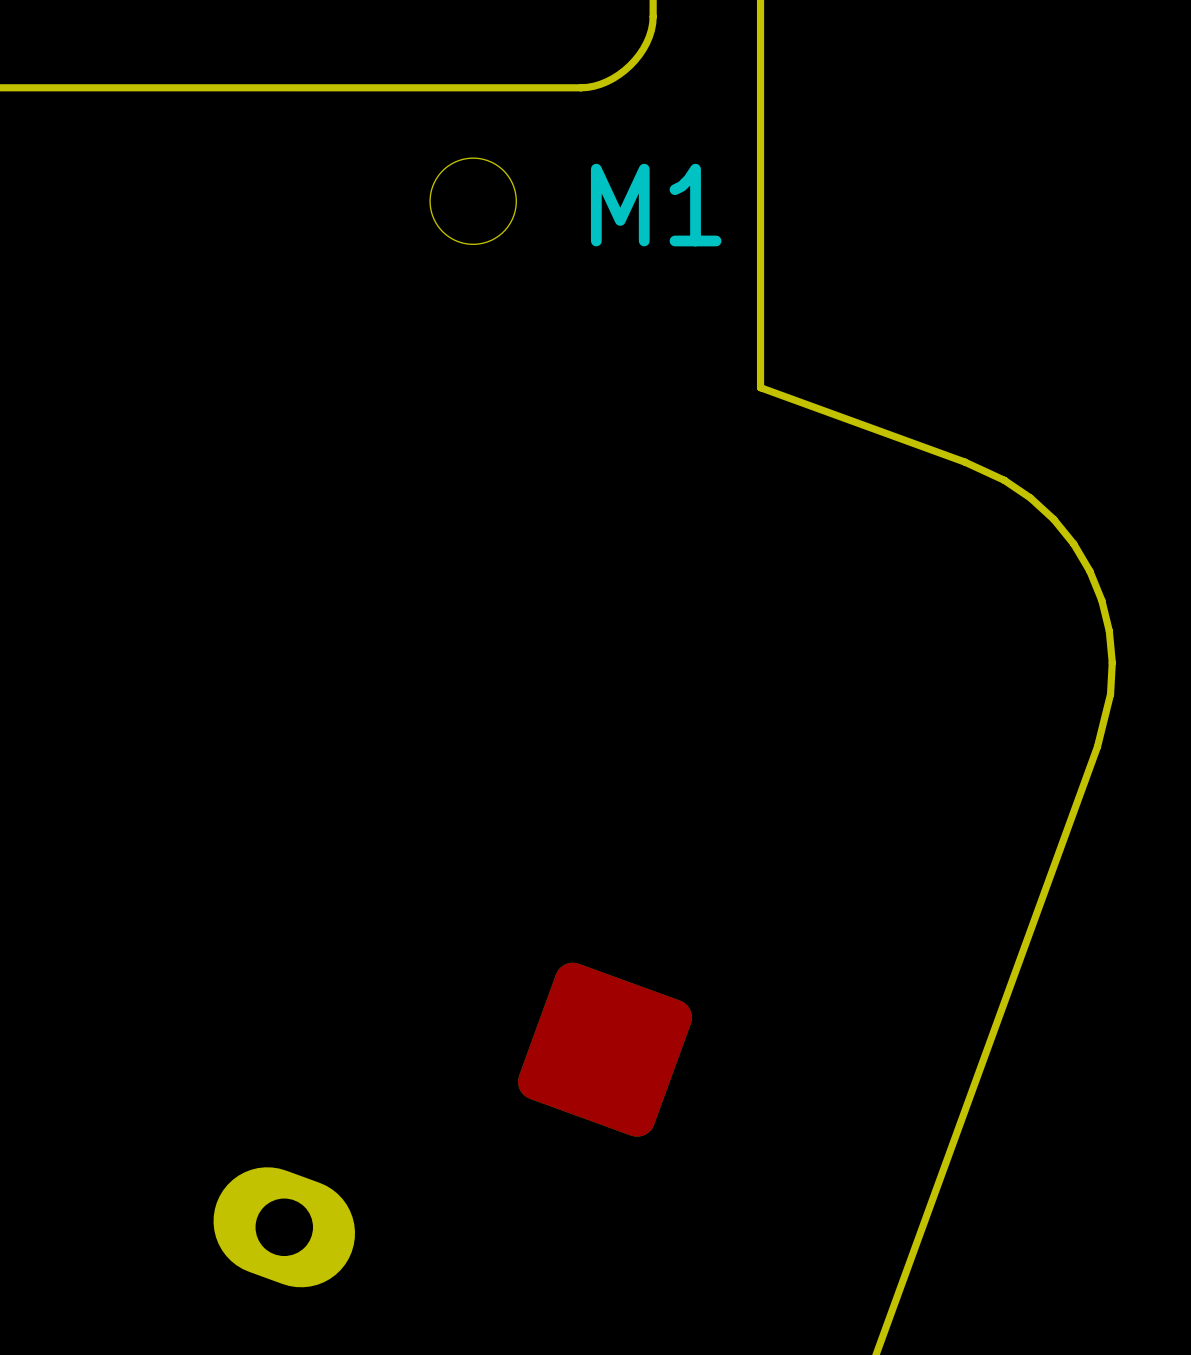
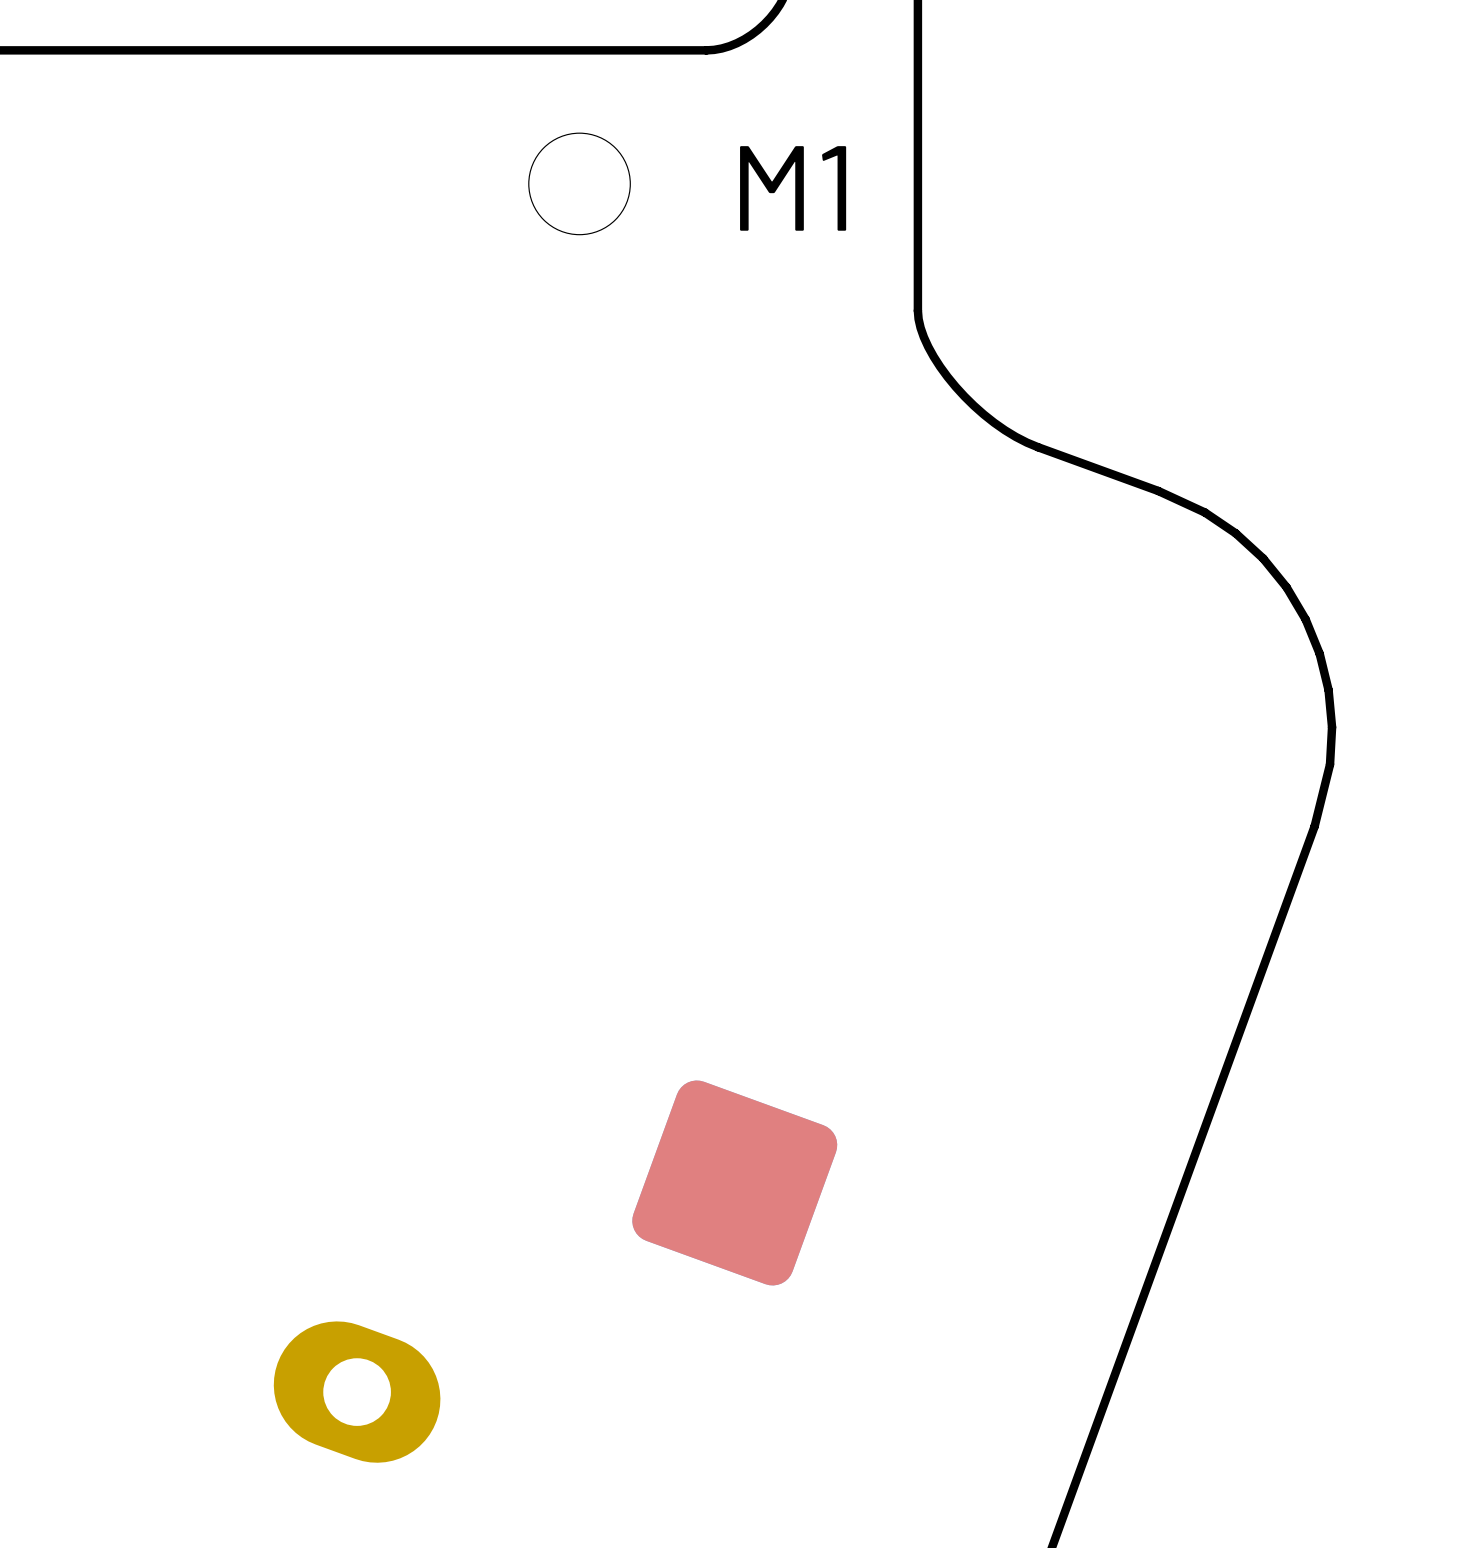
board edge: (760, 308) (760, 387) (862, 424) -> (917, 310) (920, 327) (928, 346) (955, 386) (994, 422) (1015, 436) (1038, 447)

